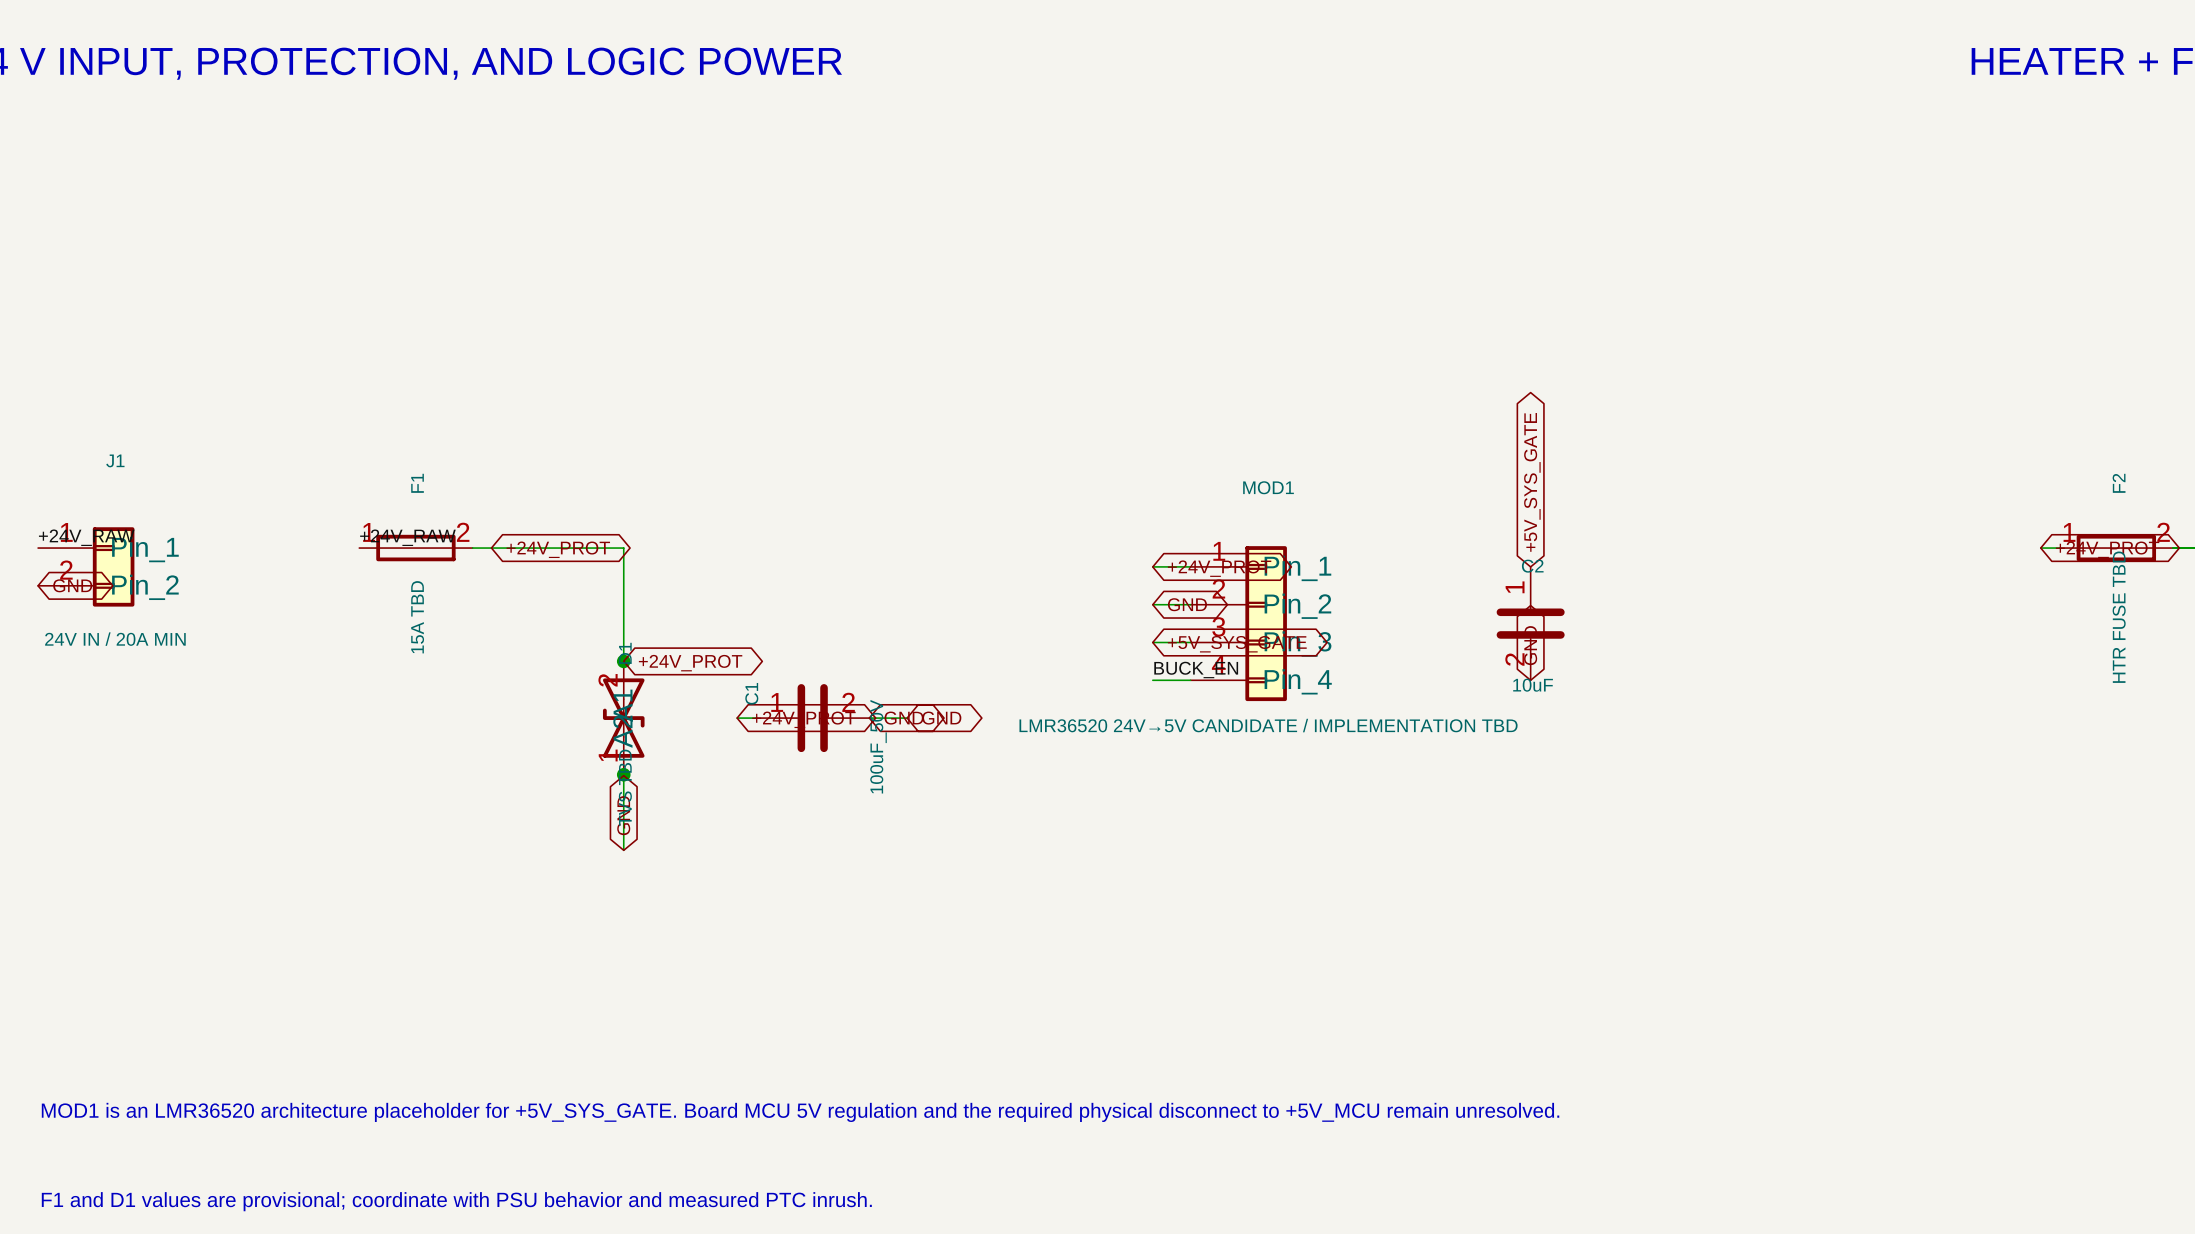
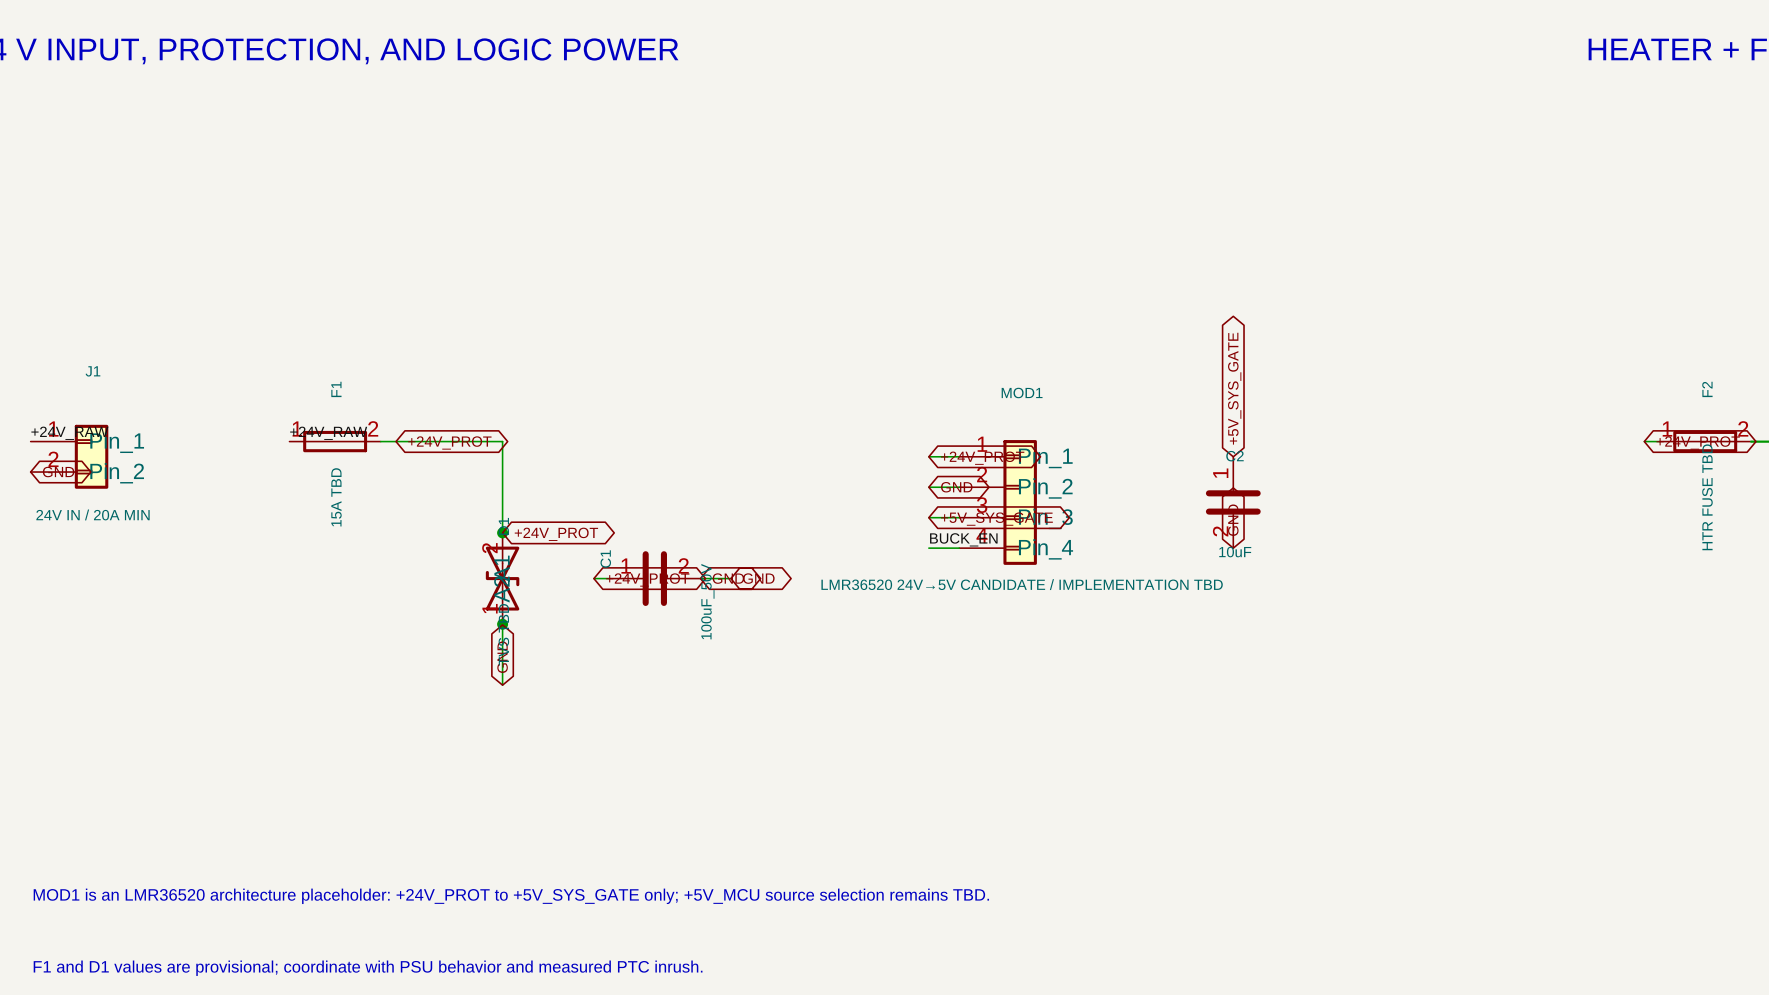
text: MOD1 is an LMR36520 architecture placeholder for +5V_SYS_GATE. Board MCU 5V regulation and the required physical disconnect to +5V_MCU remain unresolved. (800, 1112) -> MOD1 is an LMR36520 architecture placeholder: +24V_PROT to +5V_SYS_GATE only; +5V_MCU source selection remains TBD. (511, 896)

